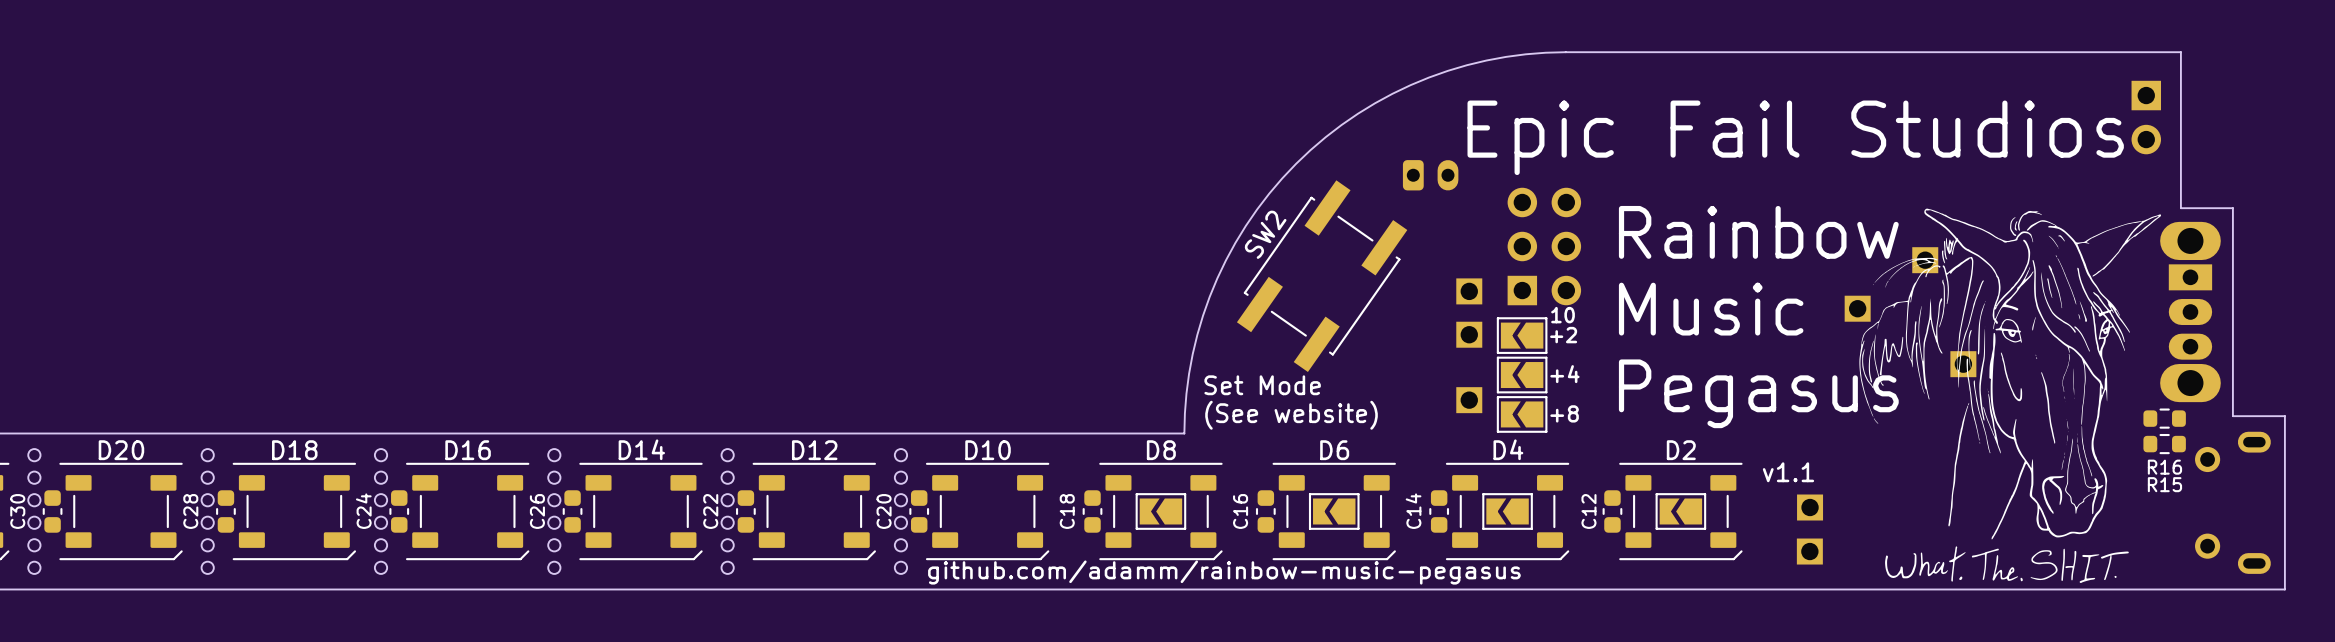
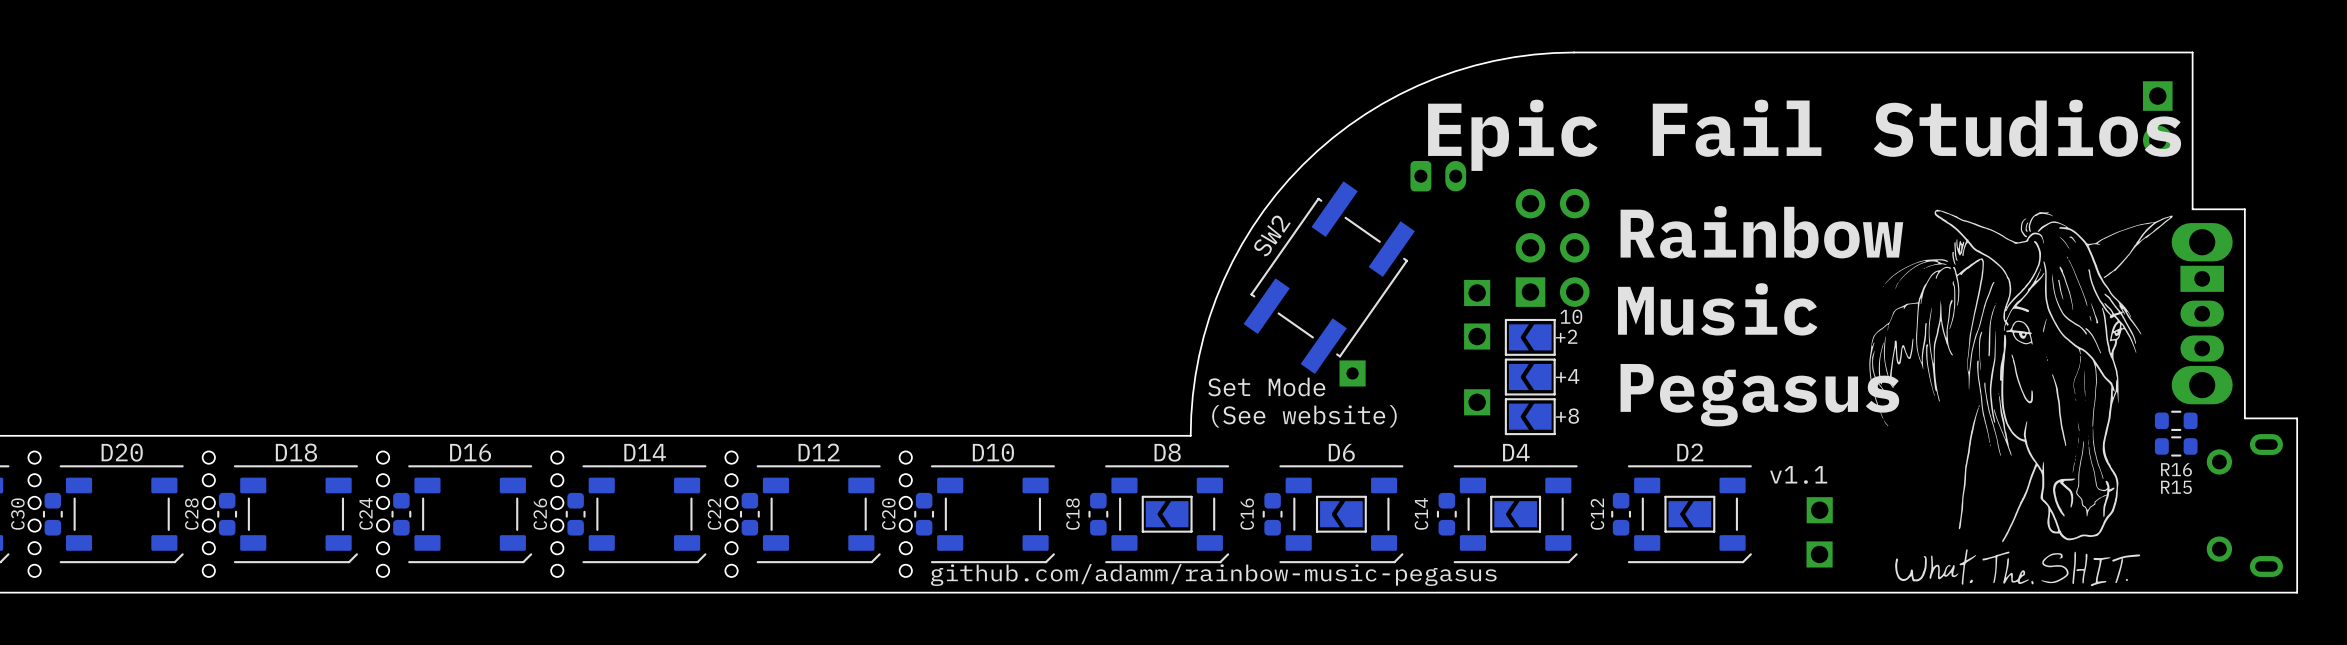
part: (1925, 260) -> none
part: (1857, 308) -> none
part: (1963, 364) -> none
part: none -> (1352, 373)

